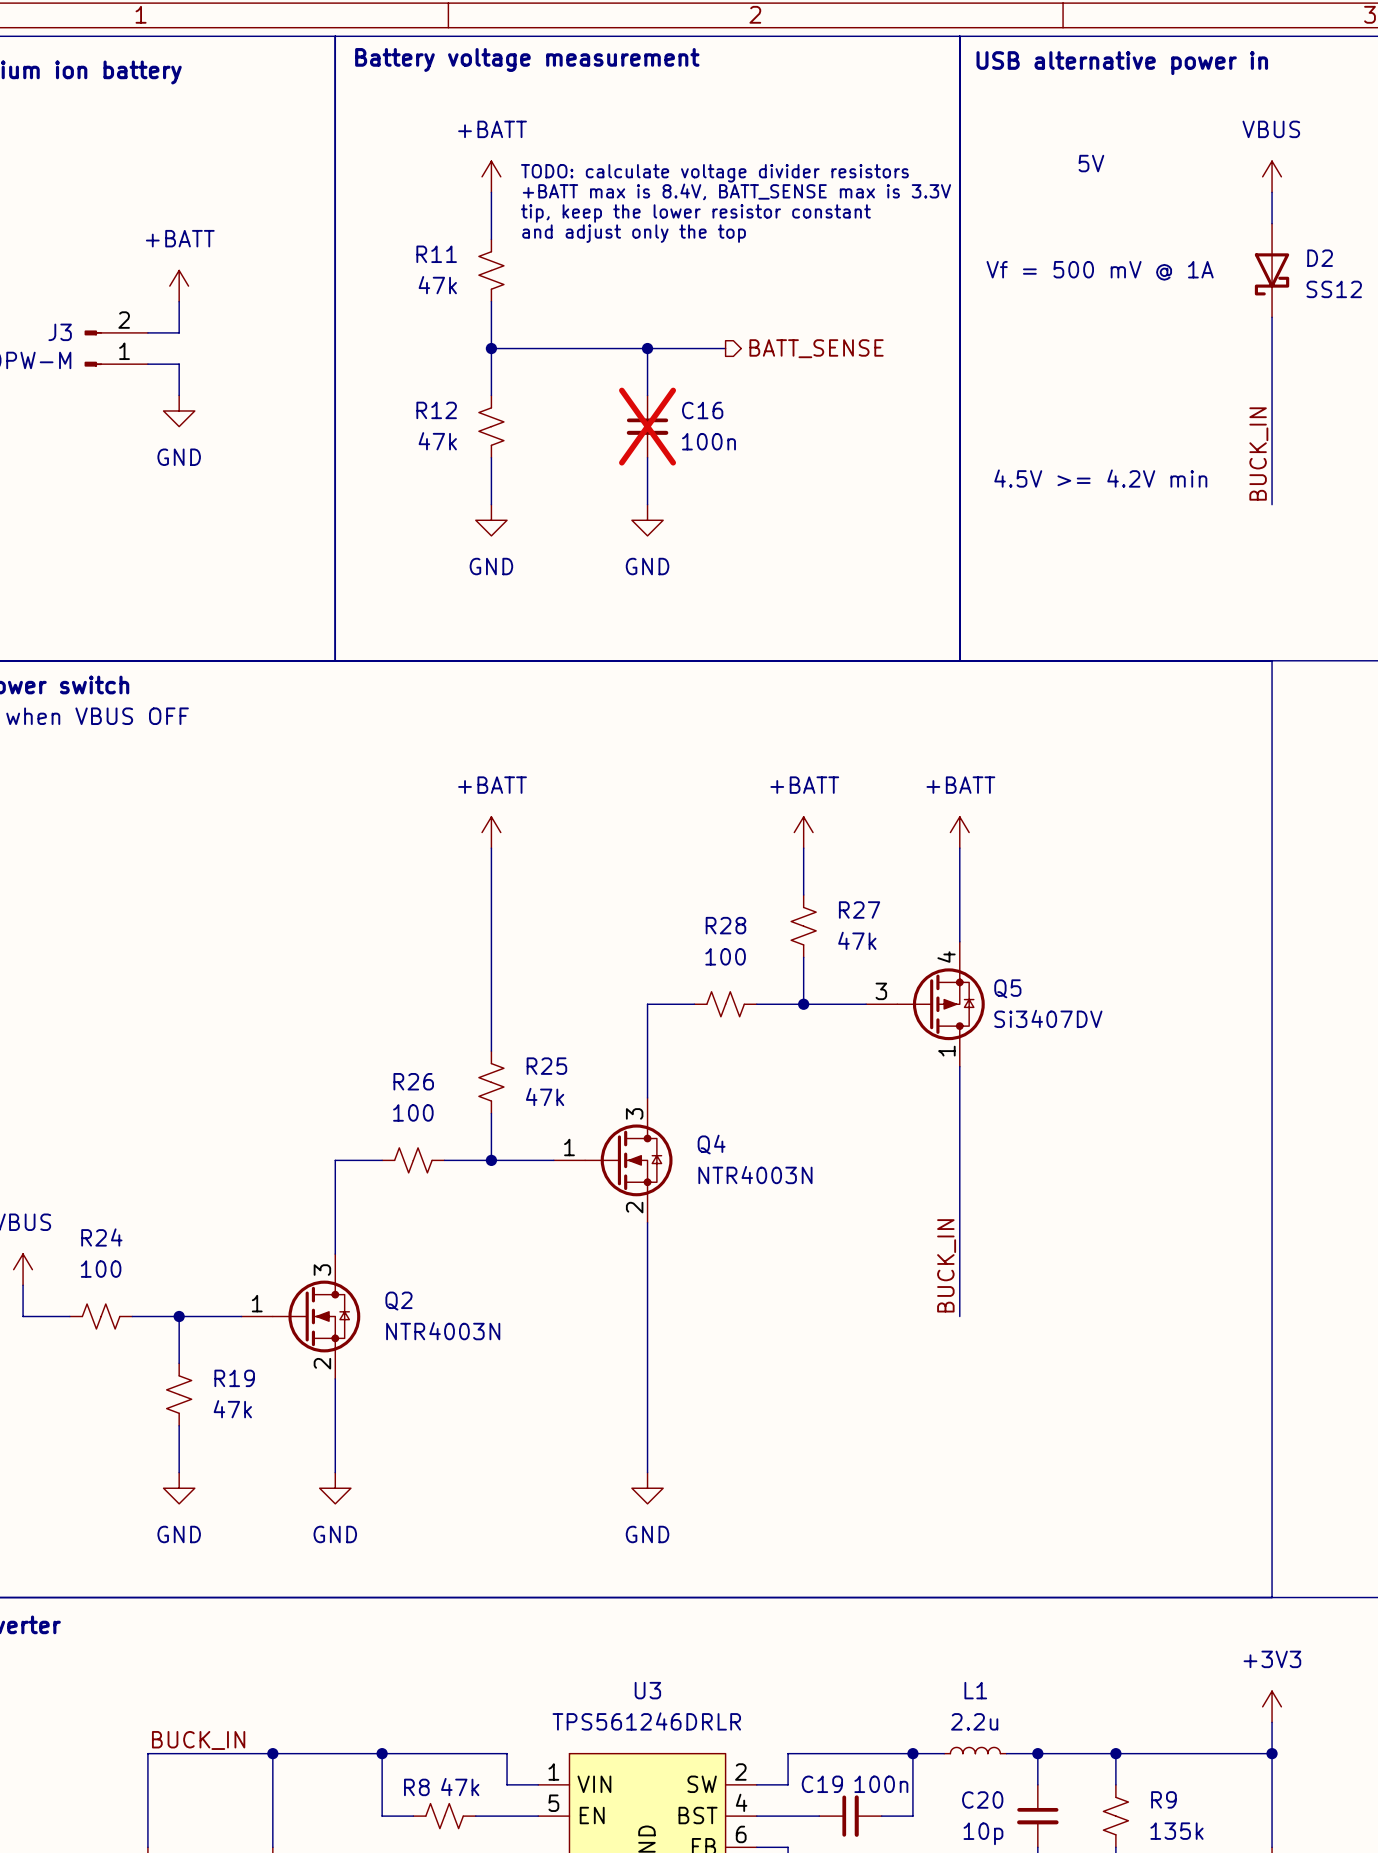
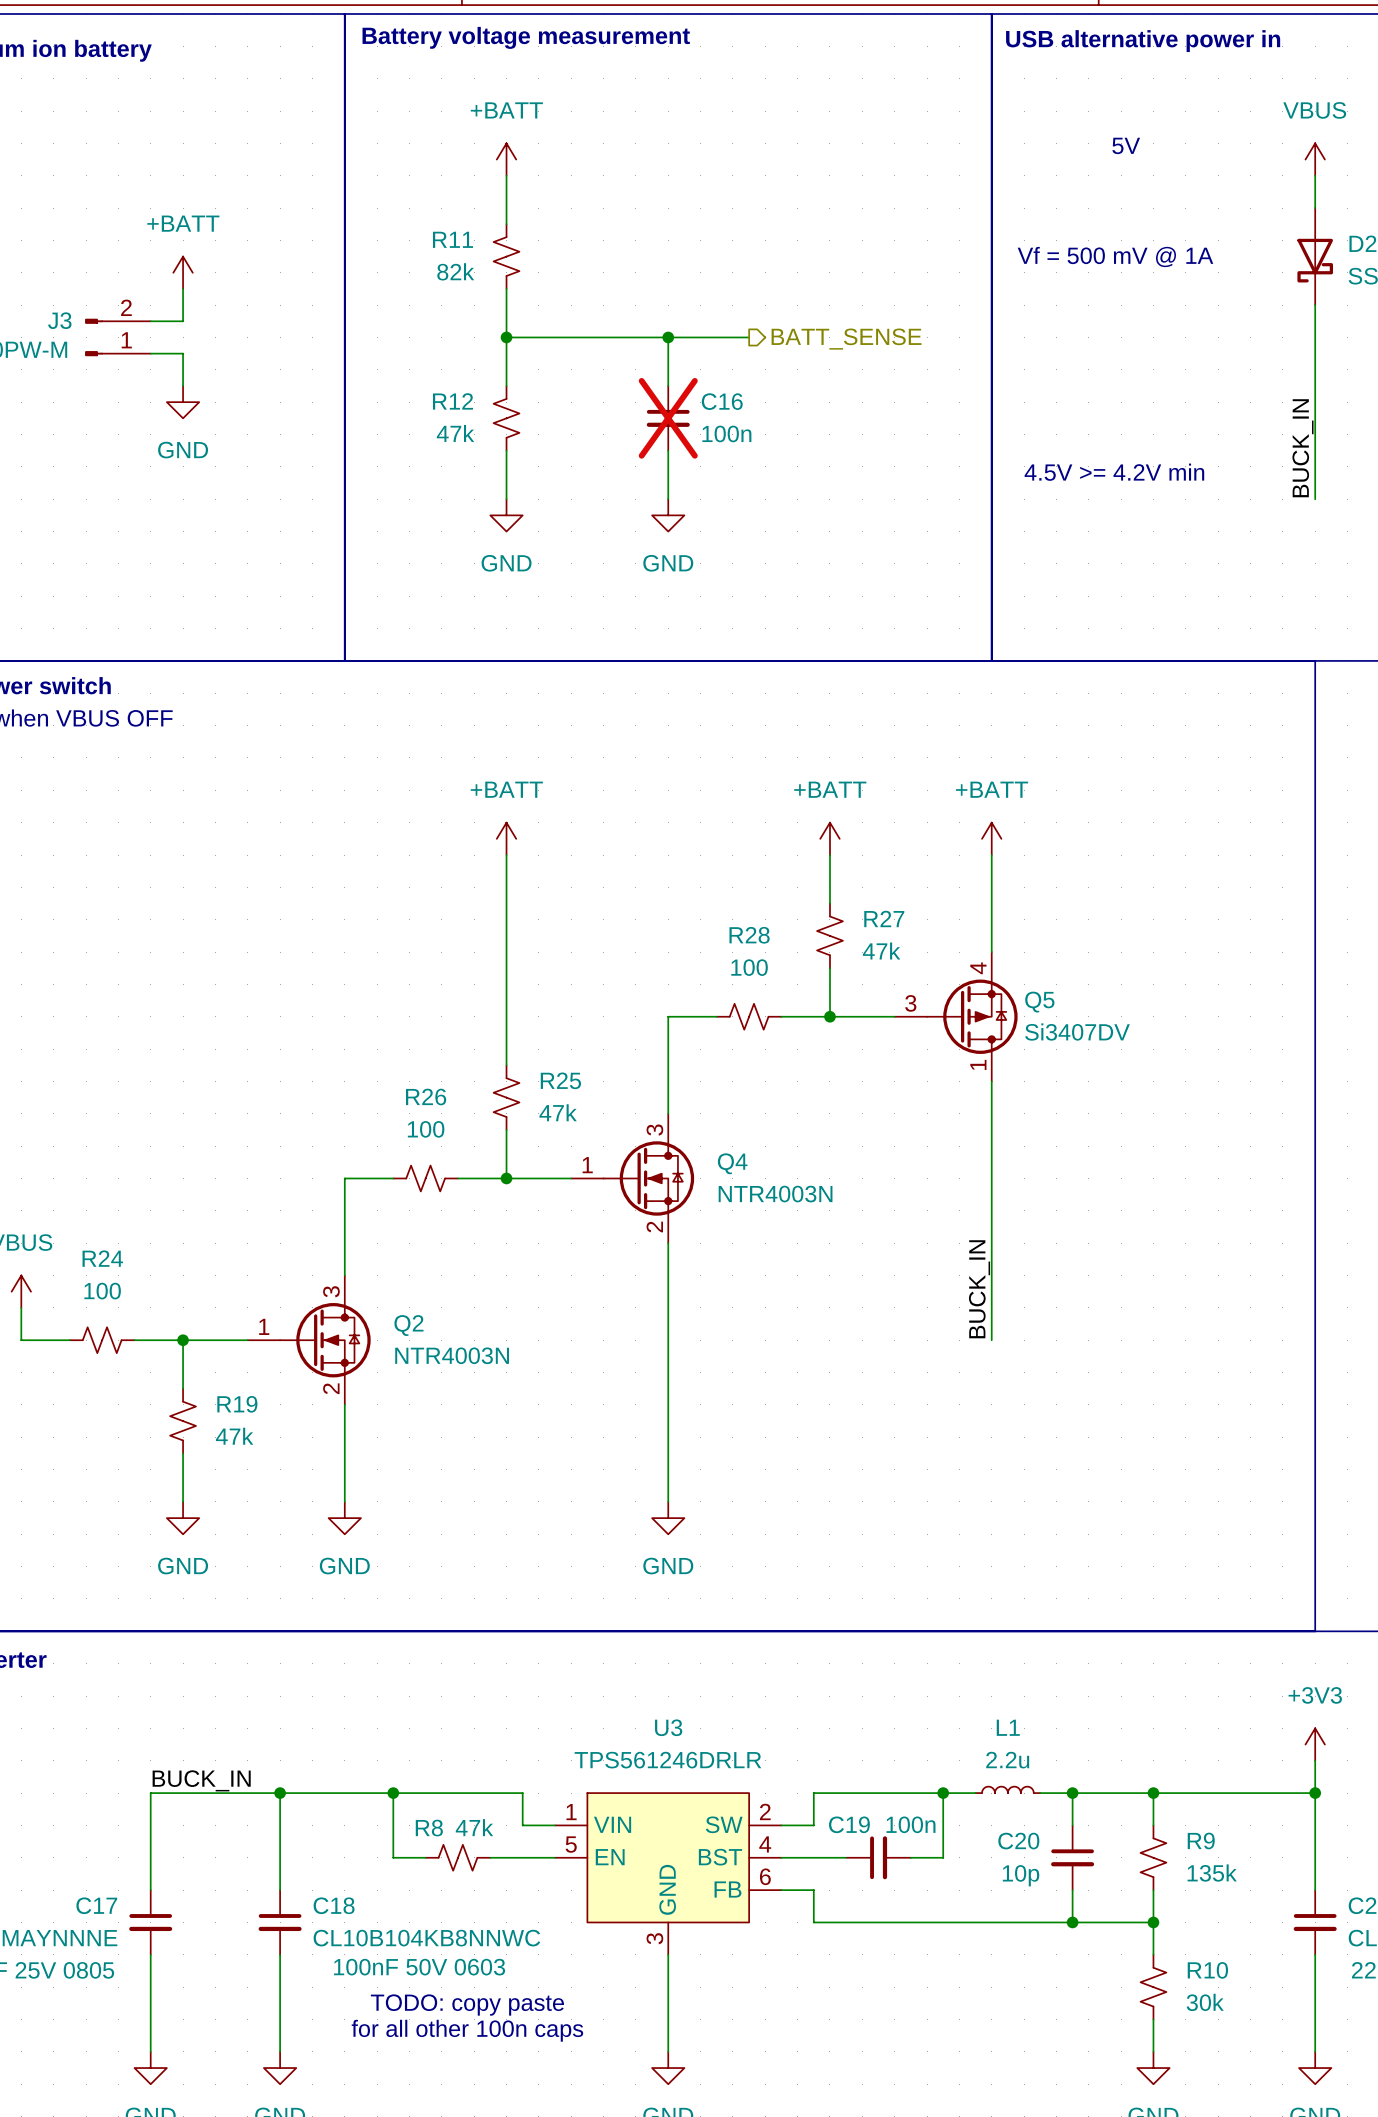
text: TODO: calculate voltage divider resistors (714, 173) -> none
text: +BATT max is 8.4V, BATT_SENSE max is 3.3V (736, 191) -> none
text: tip, keep the lower resistor constant (695, 213) -> none
text: and adjust only the top (634, 233) -> none
R11 value: 47k (437, 285) -> 82k (455, 271)

